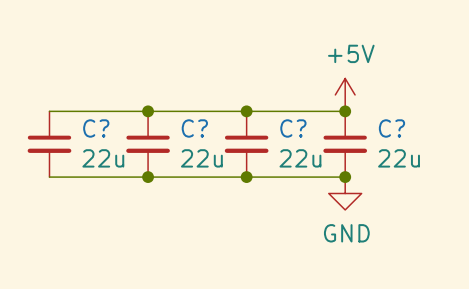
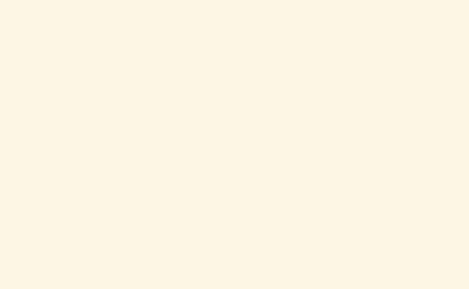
power symbol: +5V (345, 94) -> none
wire: (49, 111) (345, 111) -> none
junction: (148, 111) -> none
junction: (246, 111) -> none
junction: (345, 111) -> none
C?: 22u (49, 144) -> none
C?: 22u (148, 144) -> none
C?: 22u (246, 144) -> none
C?: 22u (345, 144) -> none
wire: (49, 177) (345, 177) -> none
junction: (148, 177) -> none
junction: (246, 177) -> none
junction: (345, 177) -> none
power symbol: GND (345, 193) -> none

